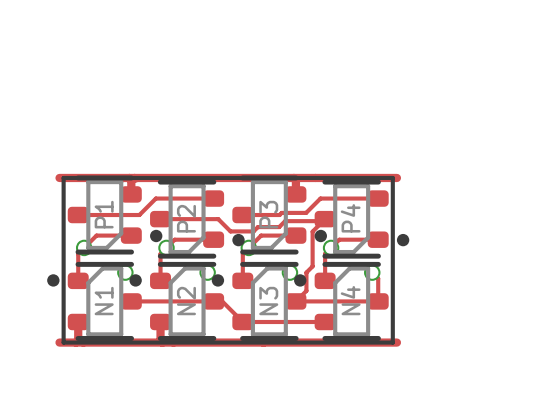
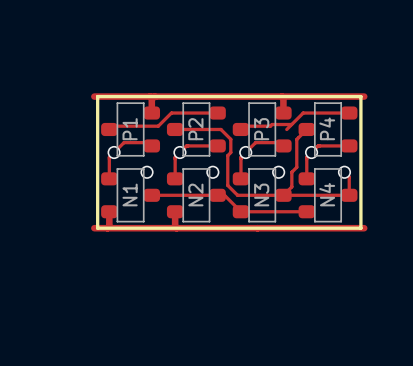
P1 footprint: [67, 175, 163, 255] -> [101, 102, 161, 157]
P3 footprint: [232, 175, 327, 255] -> [232, 102, 292, 157]
P2 footprint: [150, 179, 245, 259] -> [166, 102, 226, 157]
P4 footprint: [314, 179, 410, 259] -> [298, 102, 358, 157]
top track: (218, 219) (230, 231) (253, 231) (257, 227) (279, 227) (285, 221) (323, 221) -> (220, 129) (230, 139) (230, 152) (227, 155) (227, 185) (237, 195) (283, 195)
N1 footprint: [47, 261, 142, 341] -> [101, 168, 161, 223]
N2 footprint: [129, 261, 225, 341] -> [166, 168, 226, 223]
N3 footprint: [211, 261, 307, 341] -> [232, 168, 292, 223]
N4 footprint: [294, 261, 389, 341] -> [298, 168, 358, 223]

